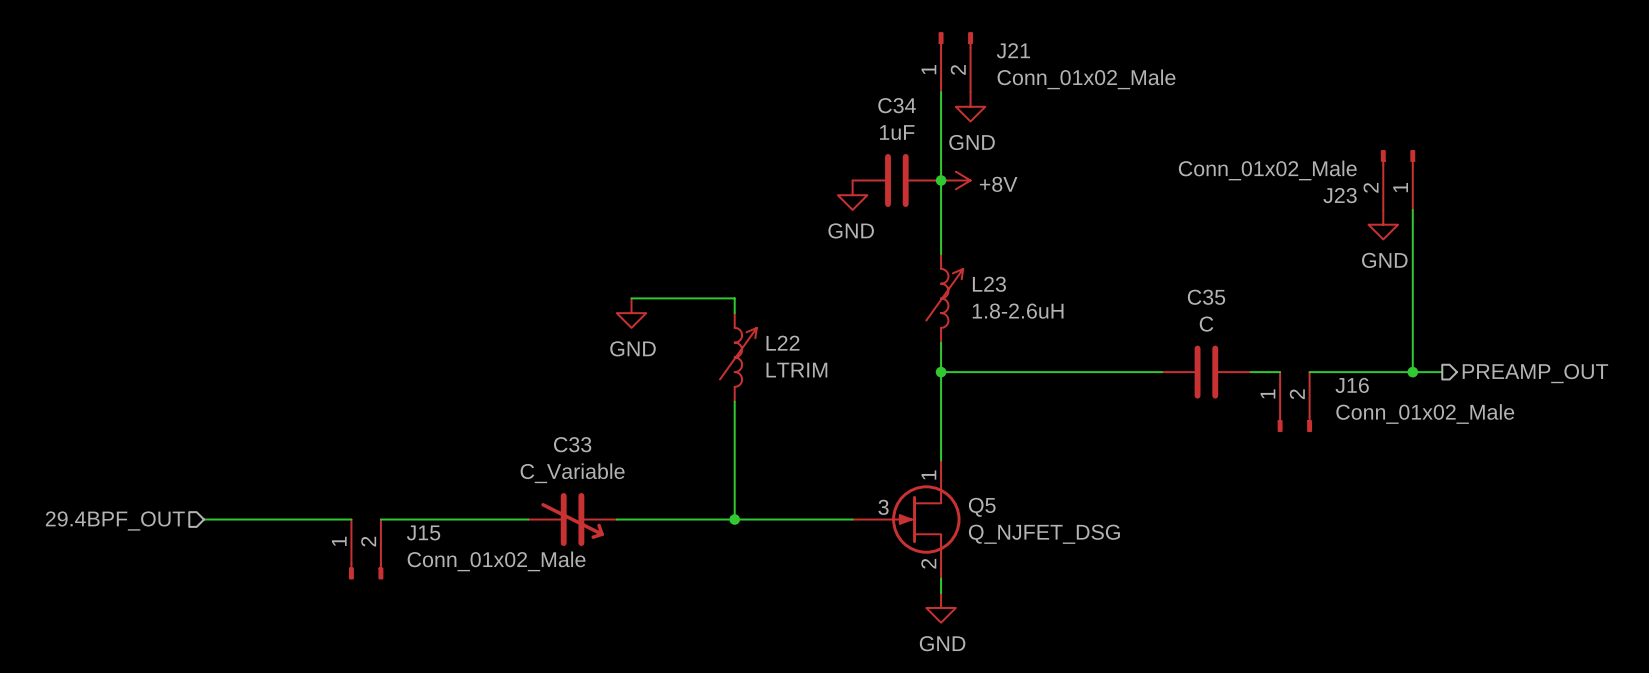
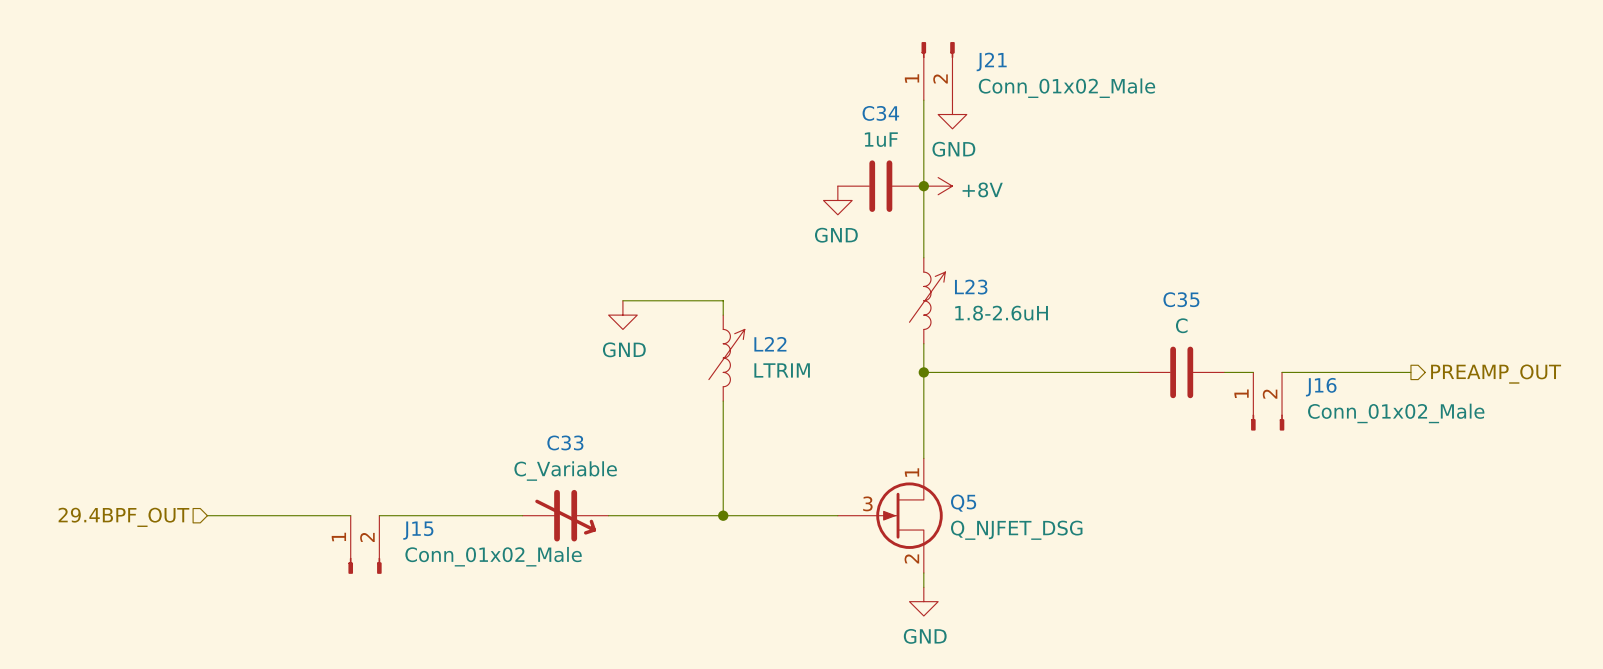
J23: Conn_01x02_Male (1398, 180) -> none
wire: (1412, 209) (1412, 372) -> none
power symbol: GND (1383, 224) -> none
junction: (1412, 372) -> none

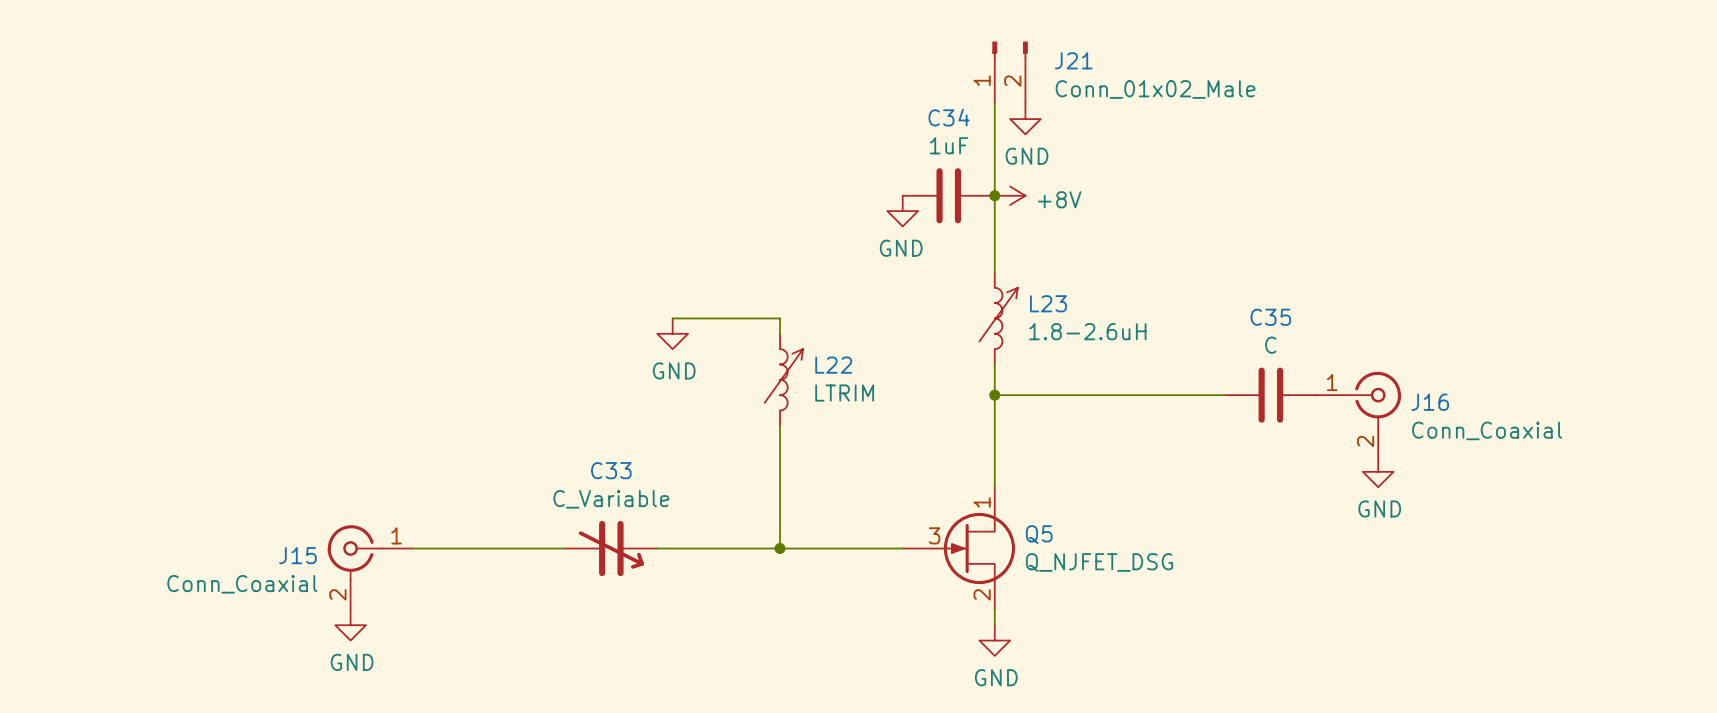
J16 symbol: [1251, 372, 1285, 431] -> [1316, 371, 1402, 457]
wire: (1282, 372) (1410, 372) -> none
hierarchical label: PREAMP_OUT (1496, 374) -> none
J16 value: Conn_01x02_Male (1396, 413) -> Conn_Coaxial (1487, 430)
power symbol: none -> GND (1378, 471)
wire: (207, 515) (350, 515) -> none
J15 symbol: [348, 515, 382, 574] -> [327, 525, 412, 610]
hierarchical label: 29.4BPF_OUT (123, 517) -> none
J15 name position: J15 (418, 530) -> J15 (297, 555)
J15 value: Conn_01x02_Male (493, 556) -> Conn_Coaxial (242, 584)
power symbol: none -> GND (350, 625)

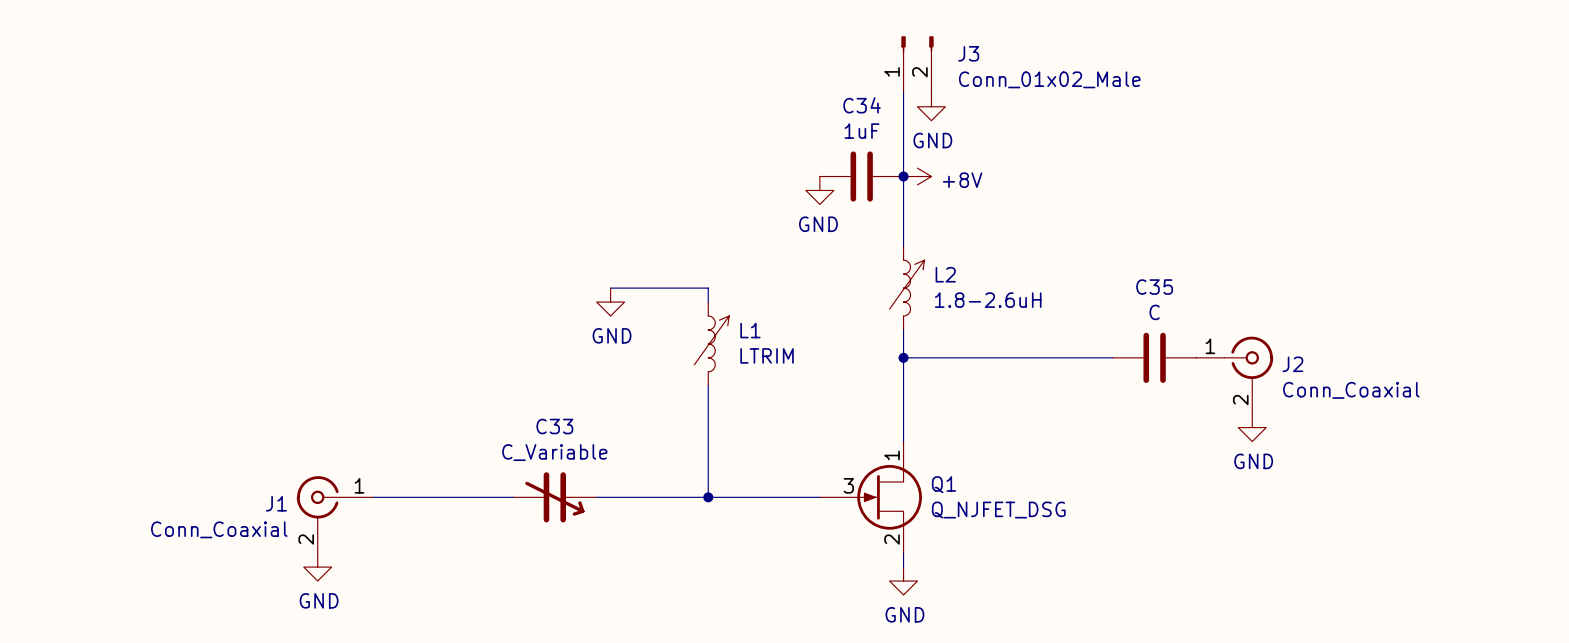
J21 name: J21 (1073, 60) -> J3 (968, 53)
L23 name: L23 (1048, 303) -> L2 (945, 274)
L22 name: L22 (833, 365) -> L1 (750, 330)
J16 name: J16 (1430, 402) -> J2 (1292, 364)
Q5 name: Q5 (1039, 534) -> Q1 (943, 484)
J15 name: J15 (297, 555) -> J1 (276, 503)

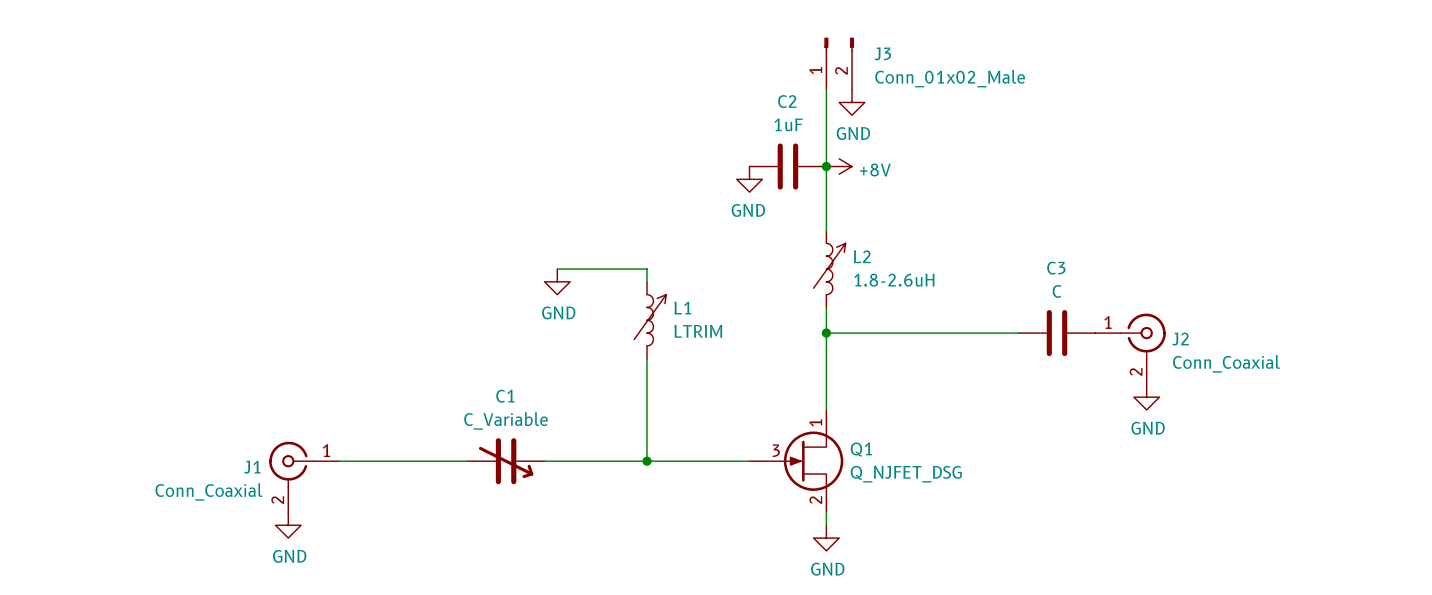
C34 name: C34 (862, 105) -> C2 (787, 101)
C35 name: C35 (1154, 287) -> C3 (1056, 268)
C33 name: C33 (554, 426) -> C1 (505, 396)

